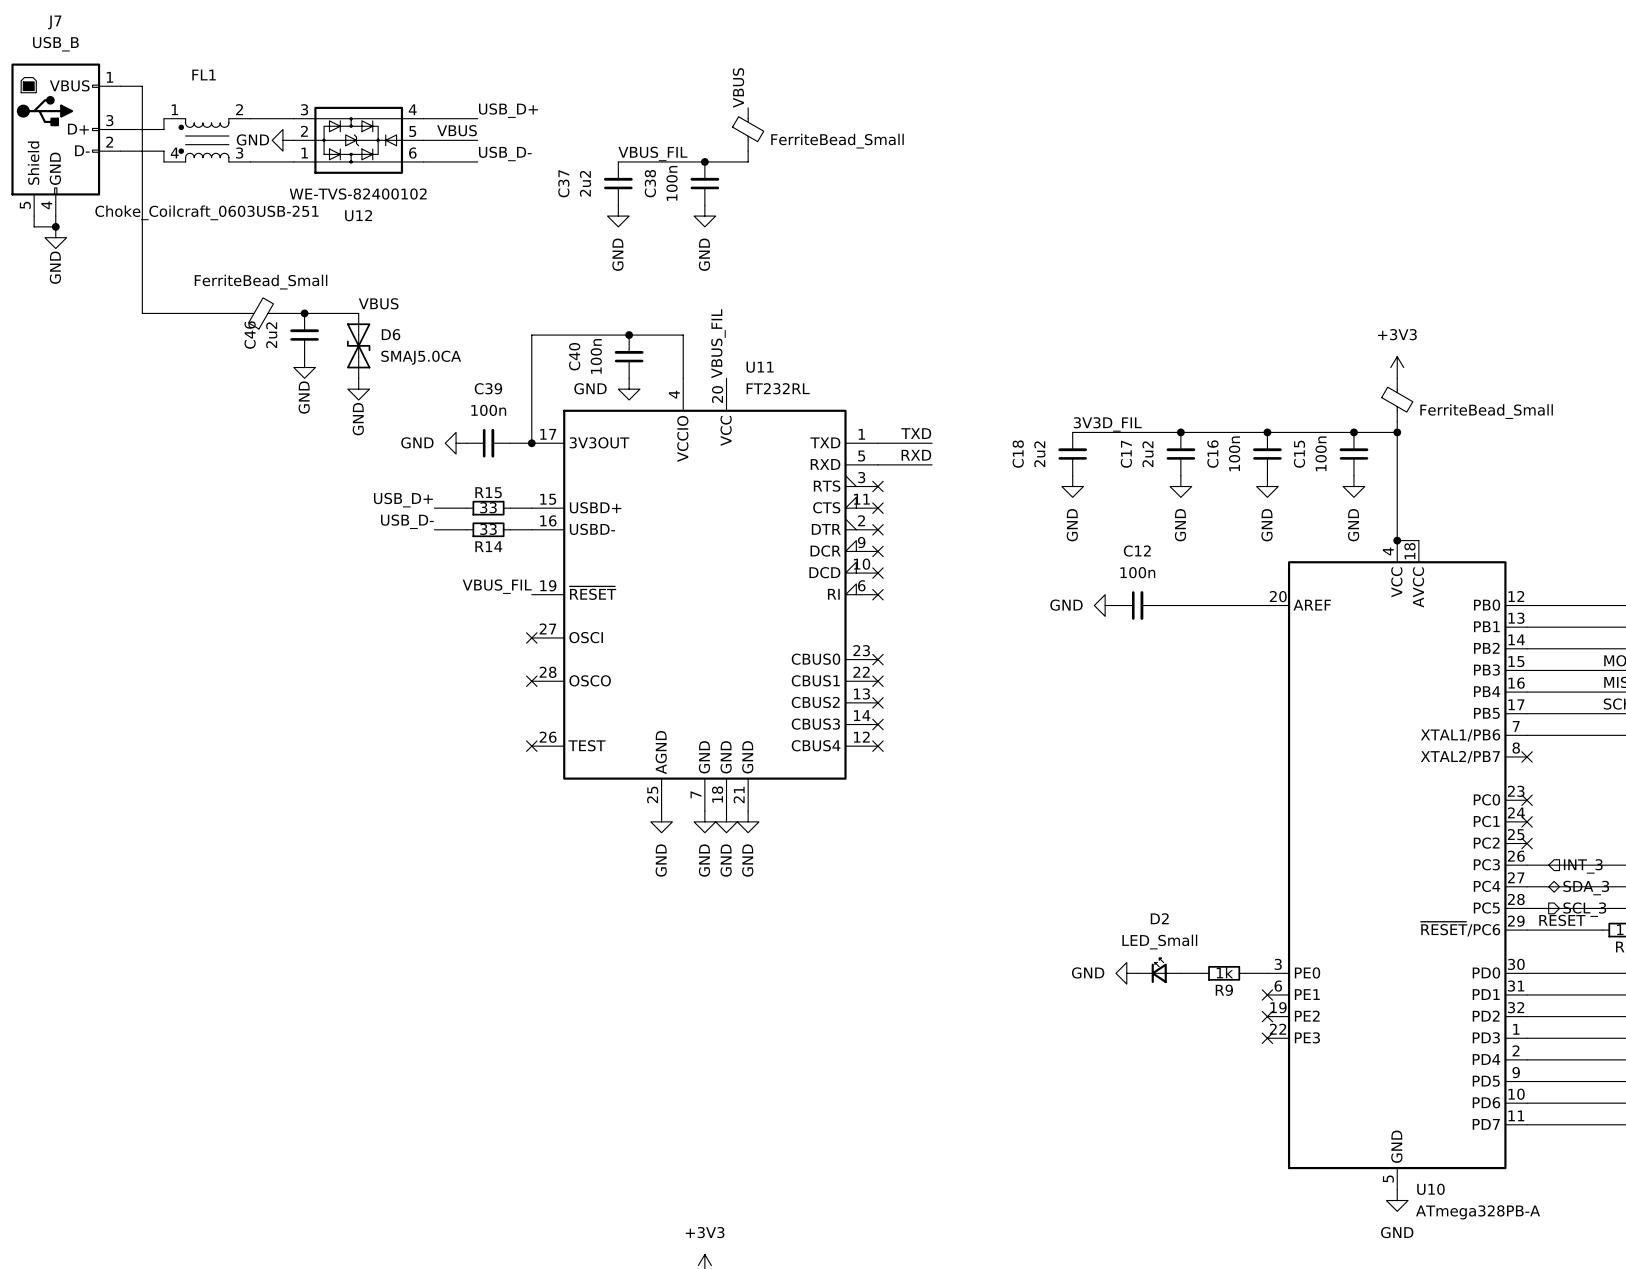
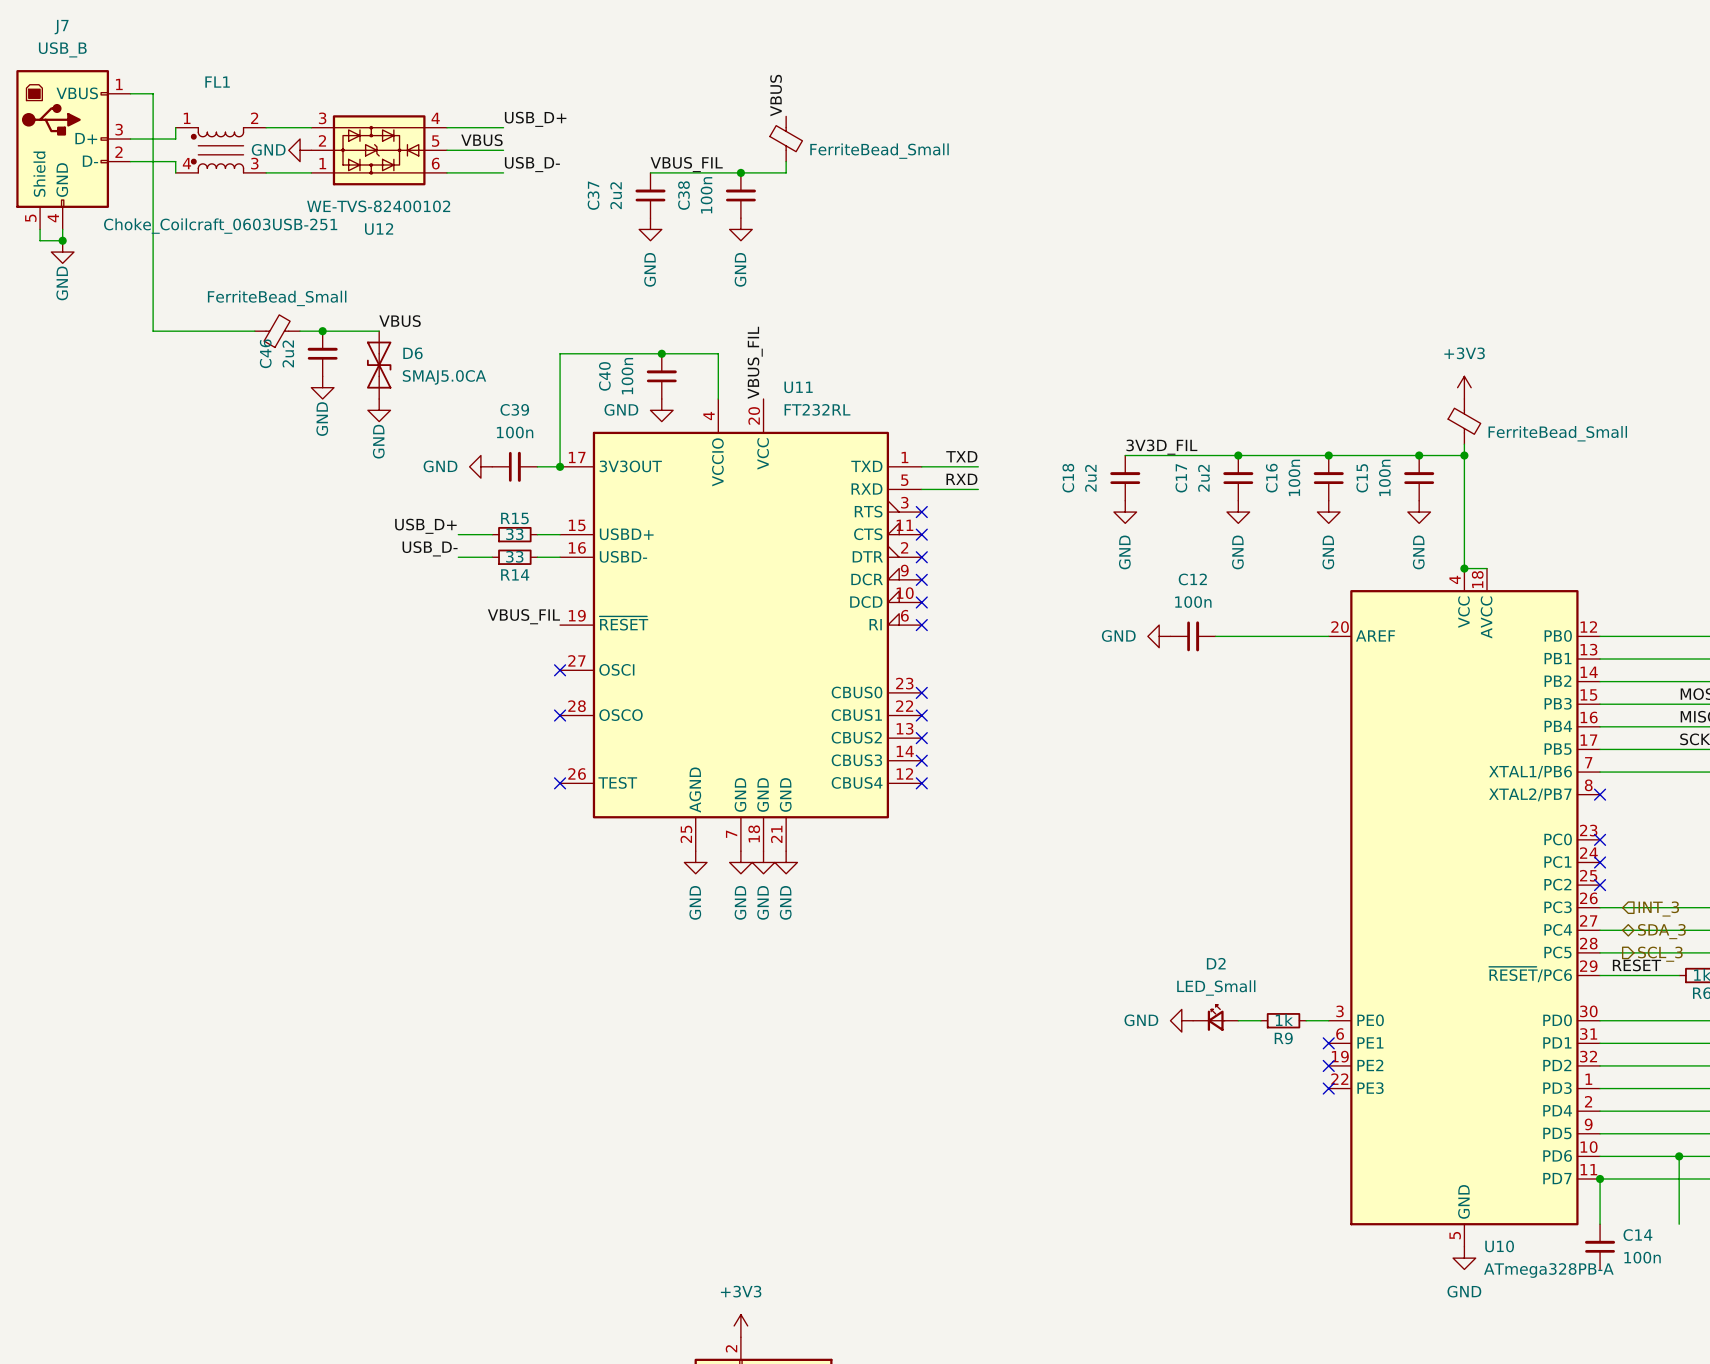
wire: none -> (1679, 1156) (1679, 1224)
junction: none -> (1679, 1156)
wire: none -> (1600, 1178) (1600, 1224)
junction: none -> (1600, 1178)
C14: none -> 100n (1600, 1246)

